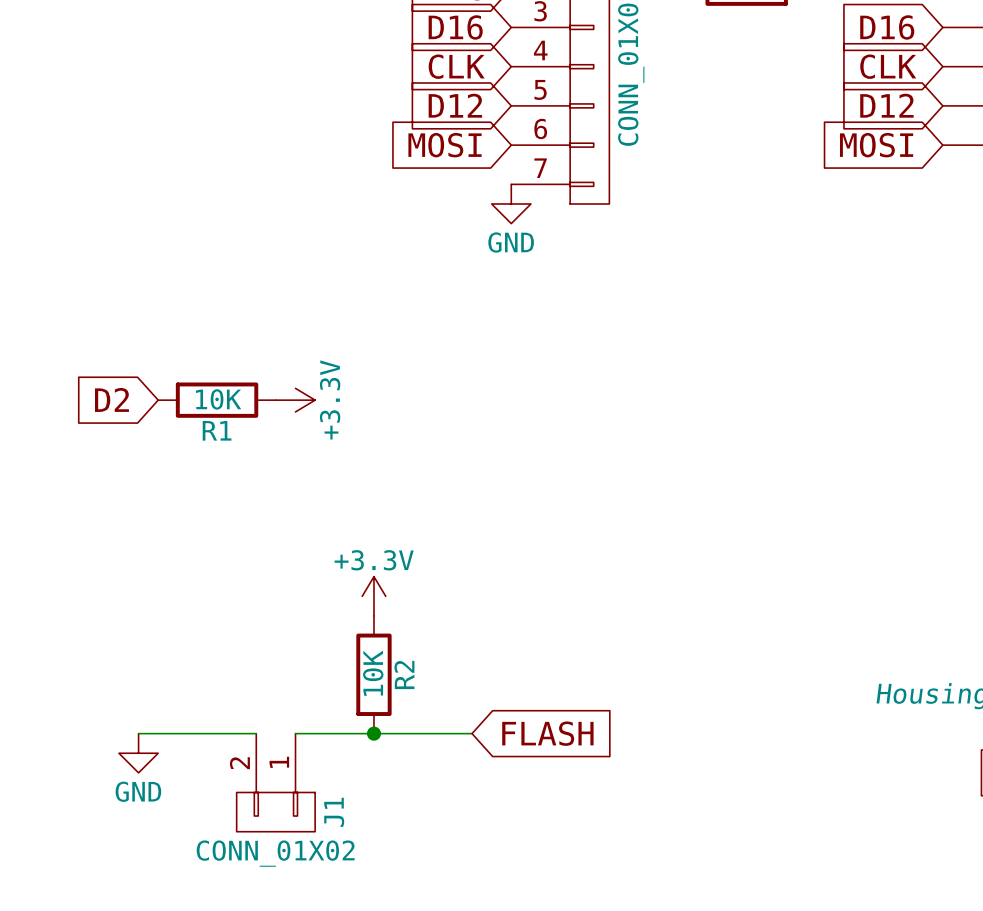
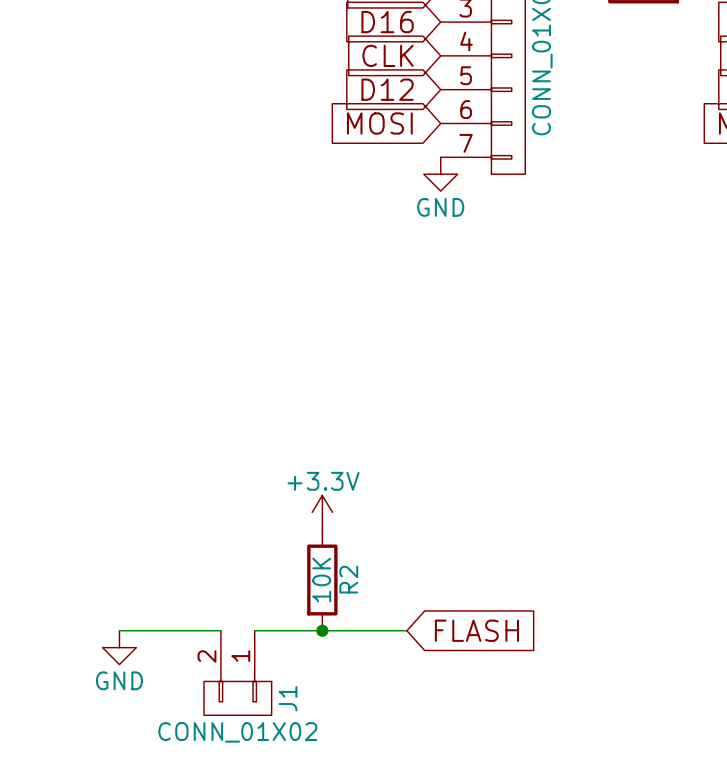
global label: D2 (111, 399) -> none
R1: 10K (217, 400) -> none
power symbol: +3.3V (295, 400) -> none

